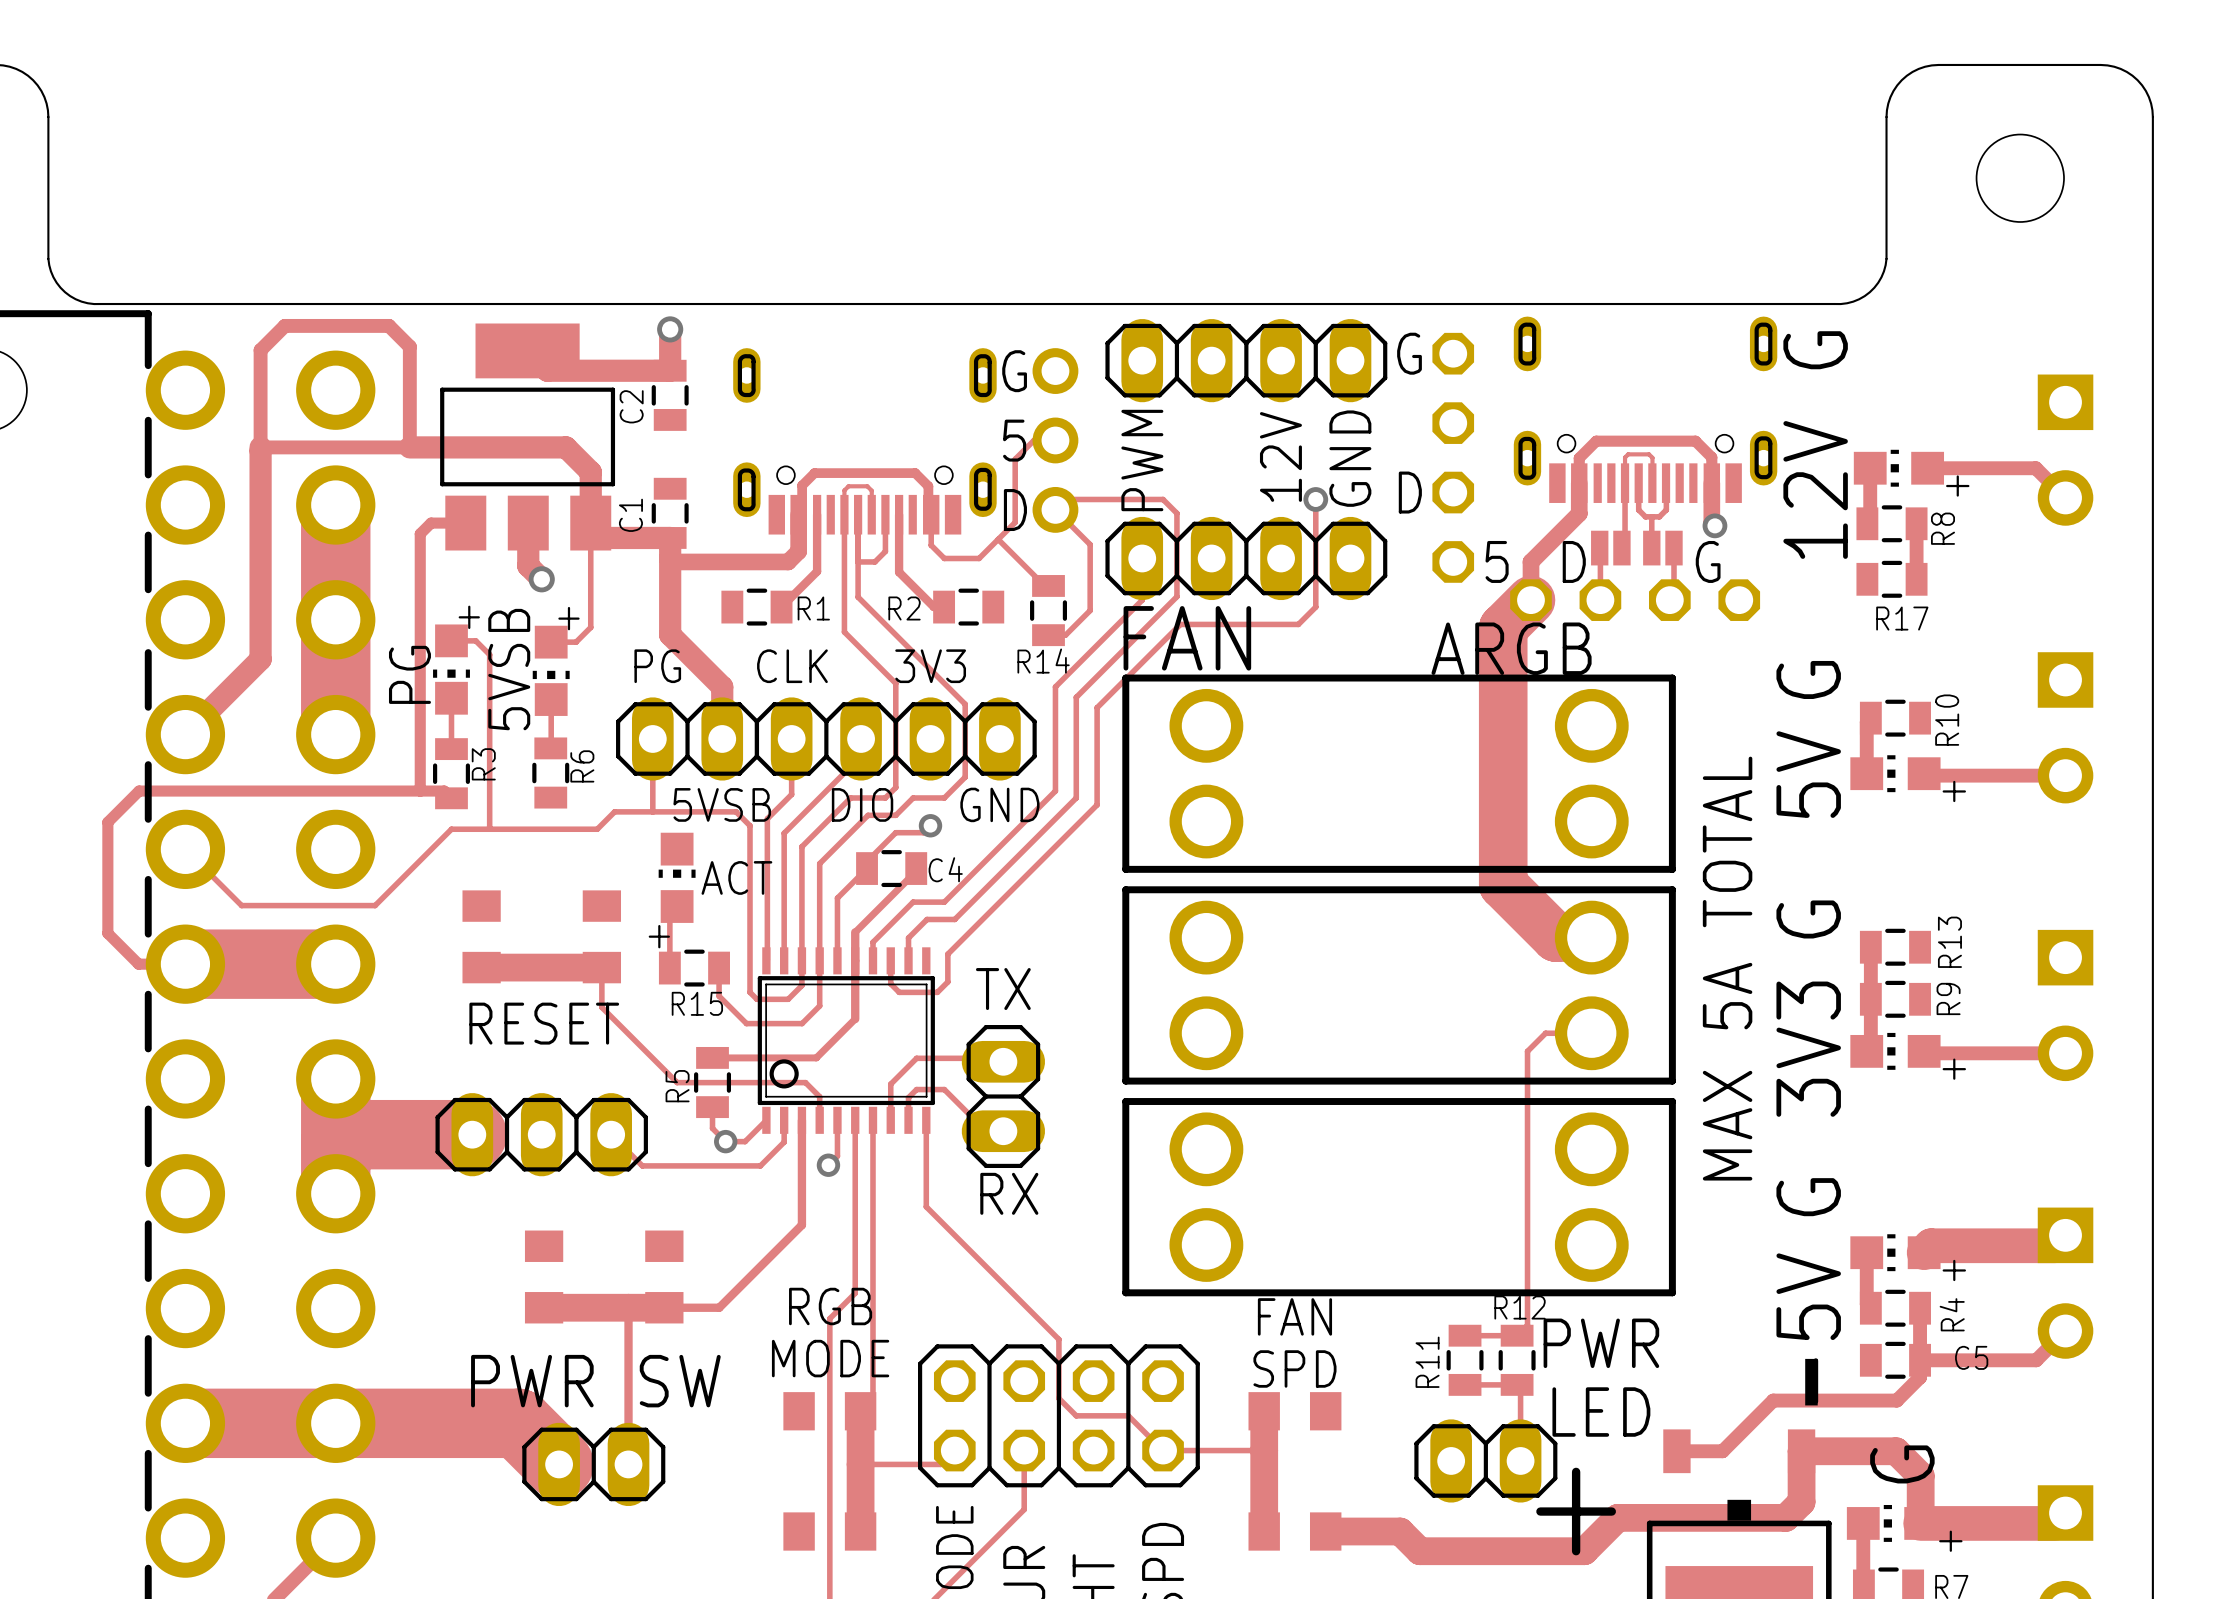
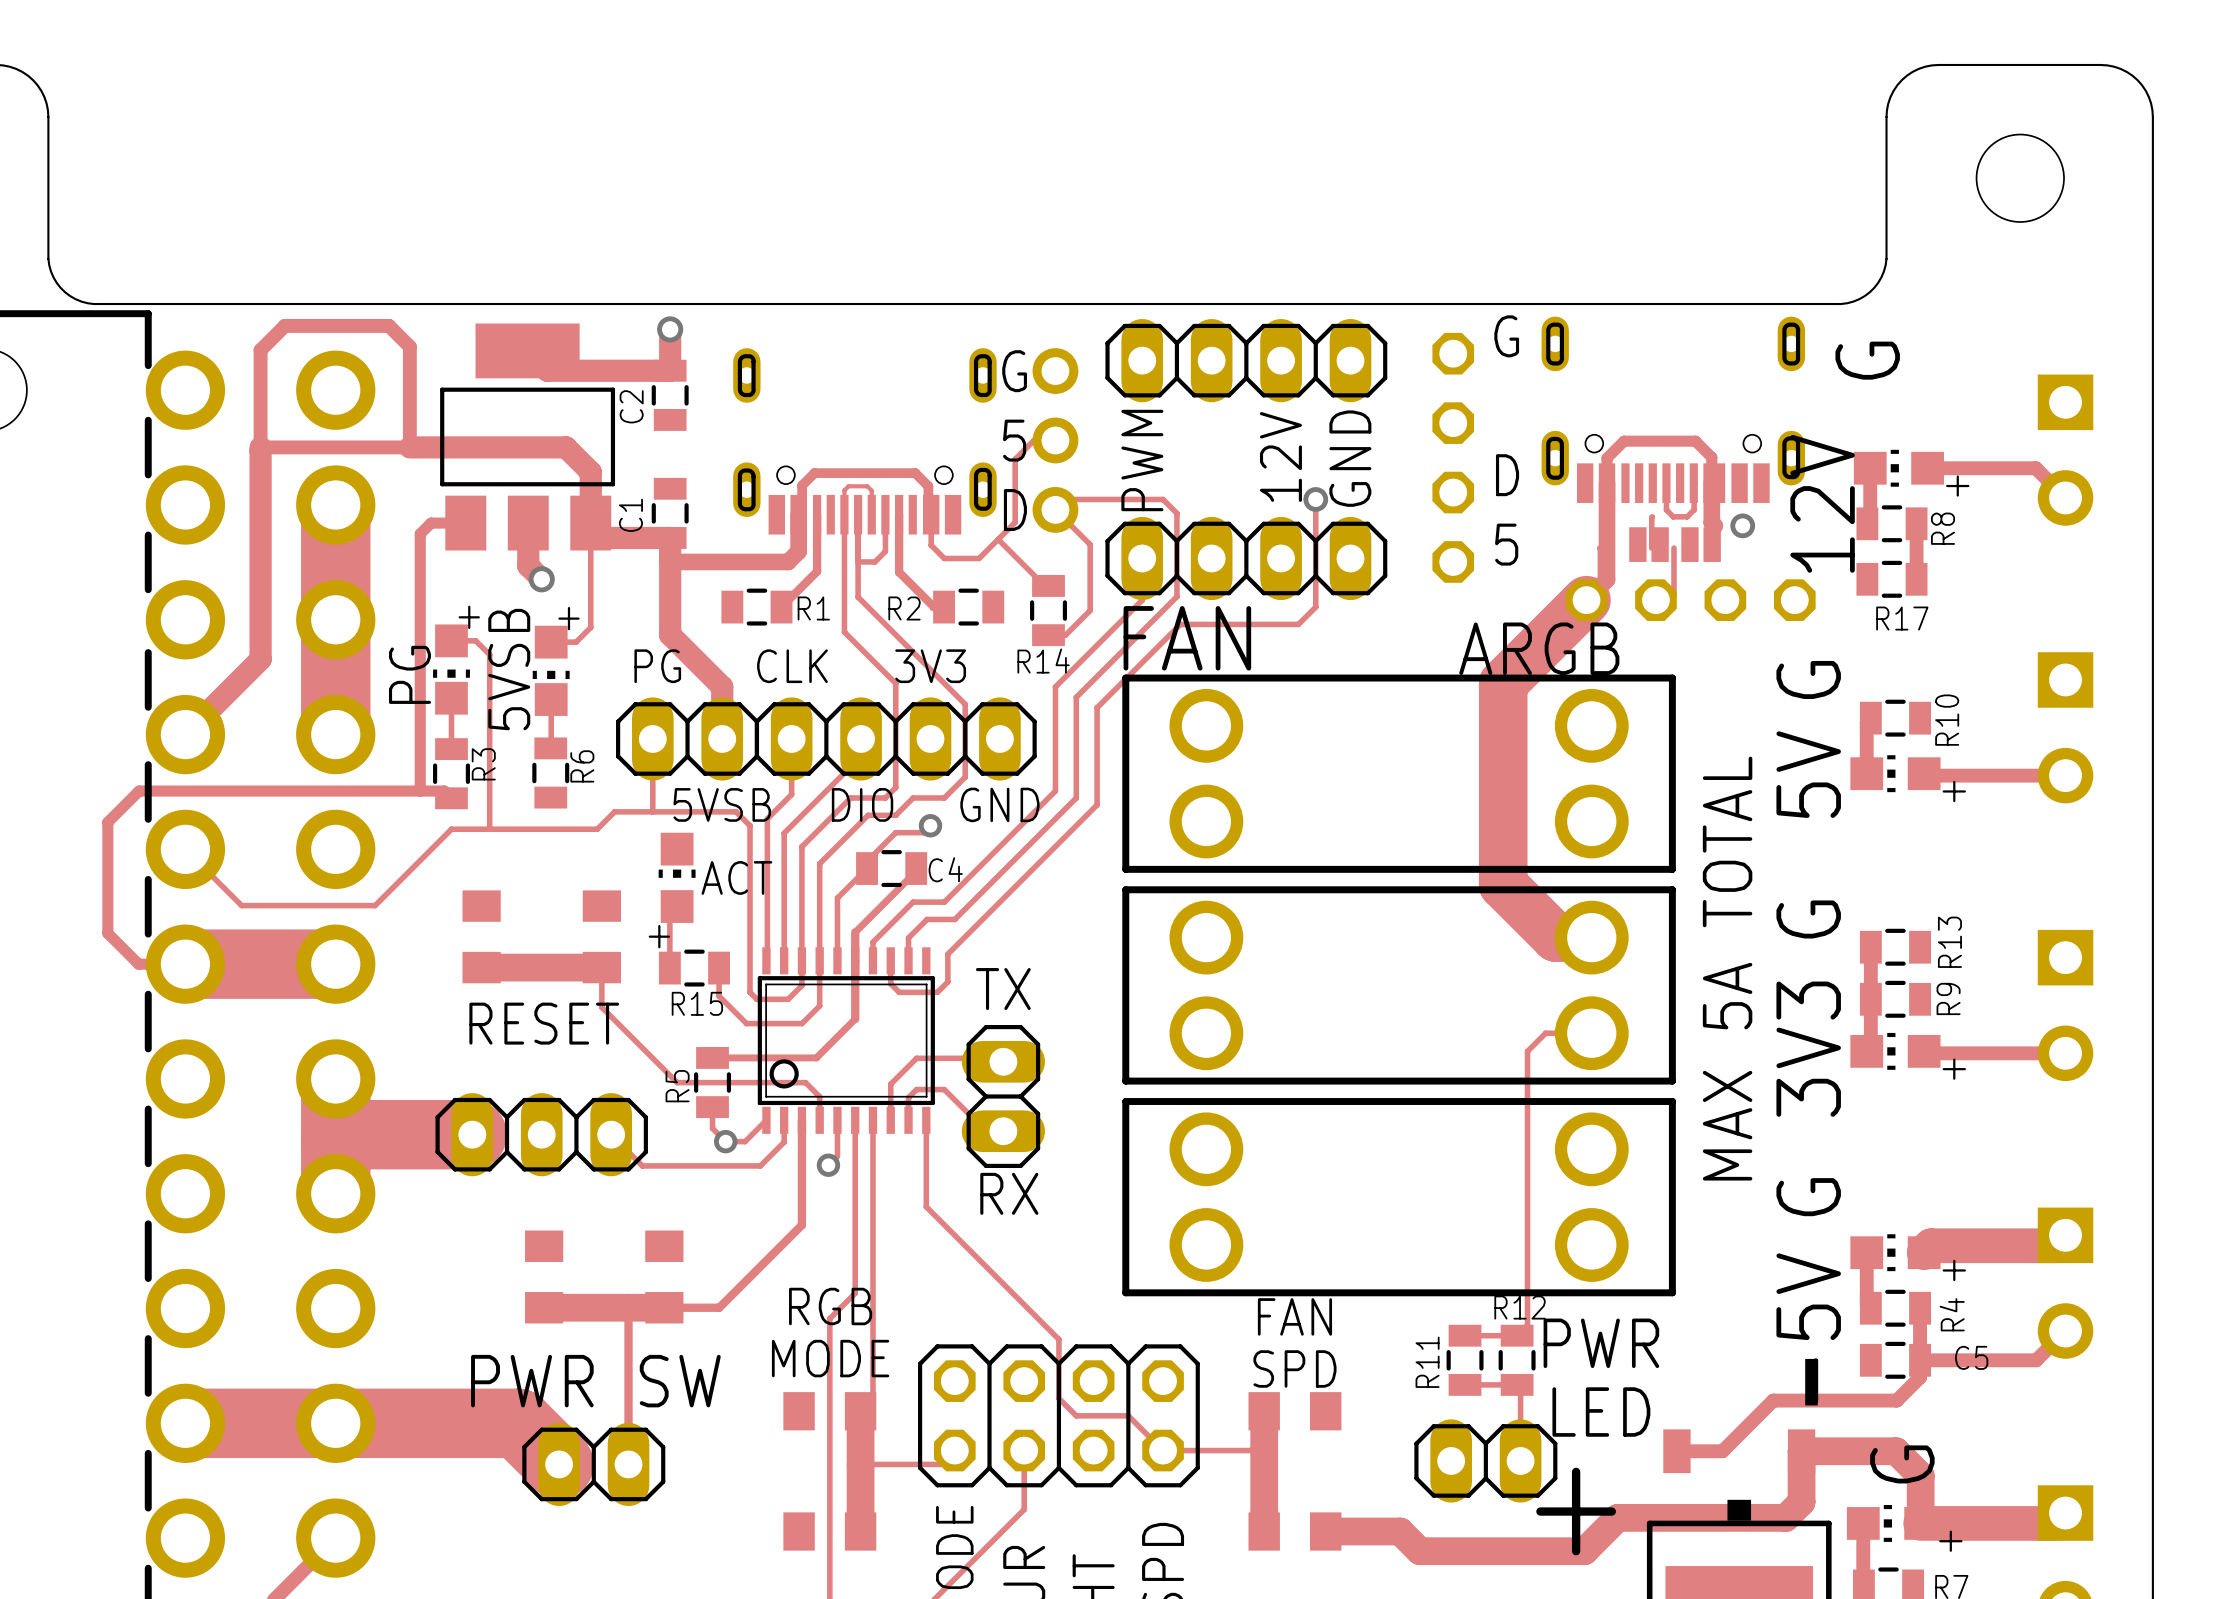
text position: G (1815, 350) -> G (1867, 360)
text position: G (1409, 353) -> G (1506, 336)
part position: (1645, 409) -> (1673, 409)
track: (1624, 441) (1596, 441) (1579, 458) (1579, 513) (1530, 561) (1530, 600) (1503, 627) (1503, 683) -> (1624, 441) (1607, 458) (1607, 579) (1503, 683)
text: none -> D (1507, 475)
track: (1638, 483) (1638, 510) (1645, 516) (1659, 516) (1666, 509) -> (1694, 483) (1694, 509) (1687, 516) (1673, 516) (1666, 510)
track: (1652, 483) (1652, 457) (1649, 454) (1628, 454) (1625, 457) (1625, 544) (1621, 548) -> none
text position: 12V (1815, 489) -> 12V (1822, 503)
text: D (1410, 492) -> none
via position: (1714, 525) -> (1742, 525)
part position: (1610, 548) -> (1701, 544)
part position: (1662, 548) -> (1649, 544)
text position: 5 (1497, 561) -> 5 (1506, 544)
text: D (1574, 561) -> none
text: G (1708, 561) -> none
part position: (1635, 600) -> (1690, 600)
text position: ARGB (1511, 648) -> ARGB (1539, 648)

